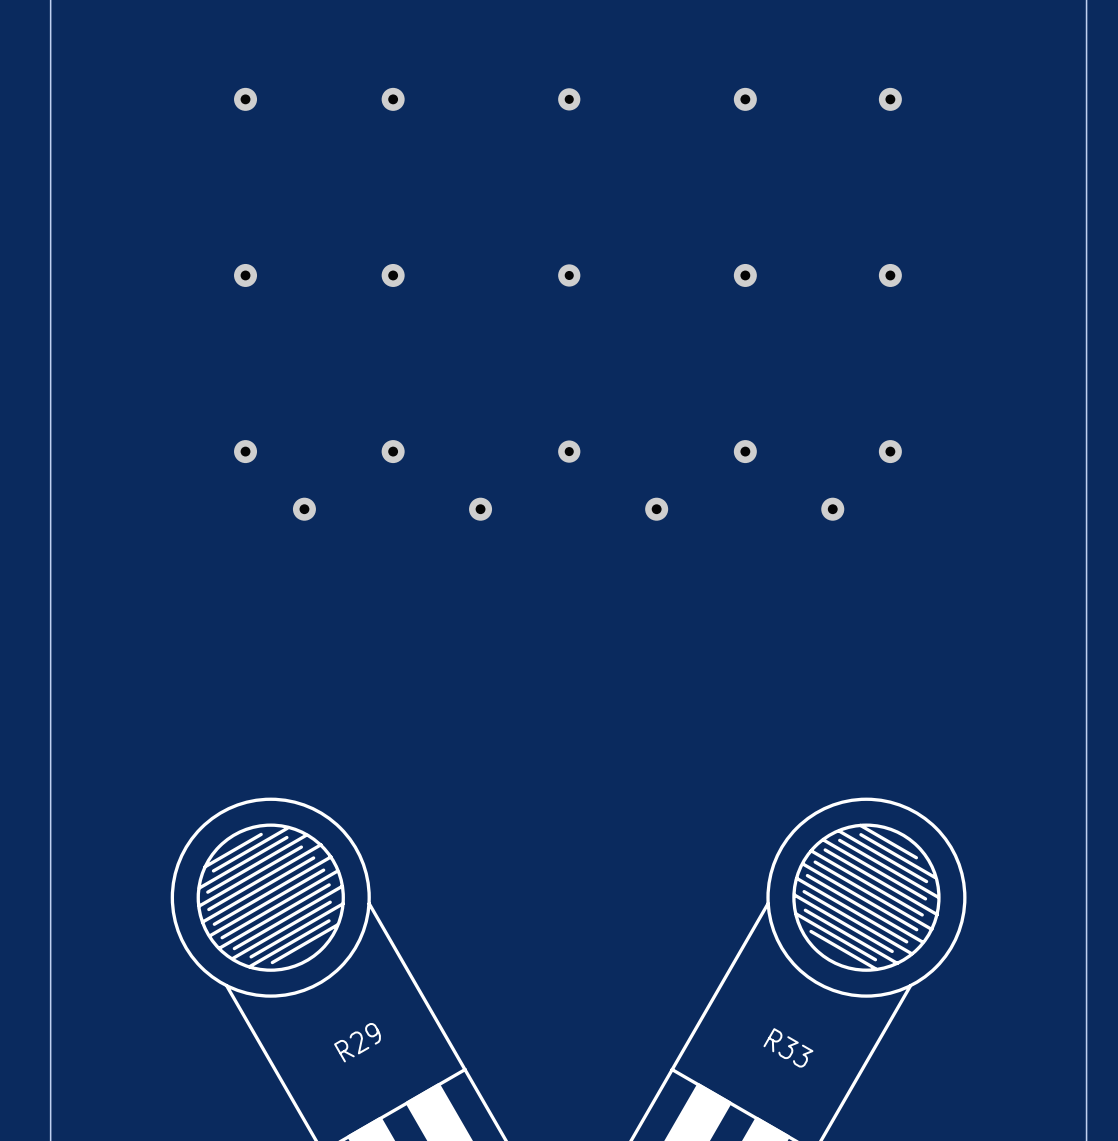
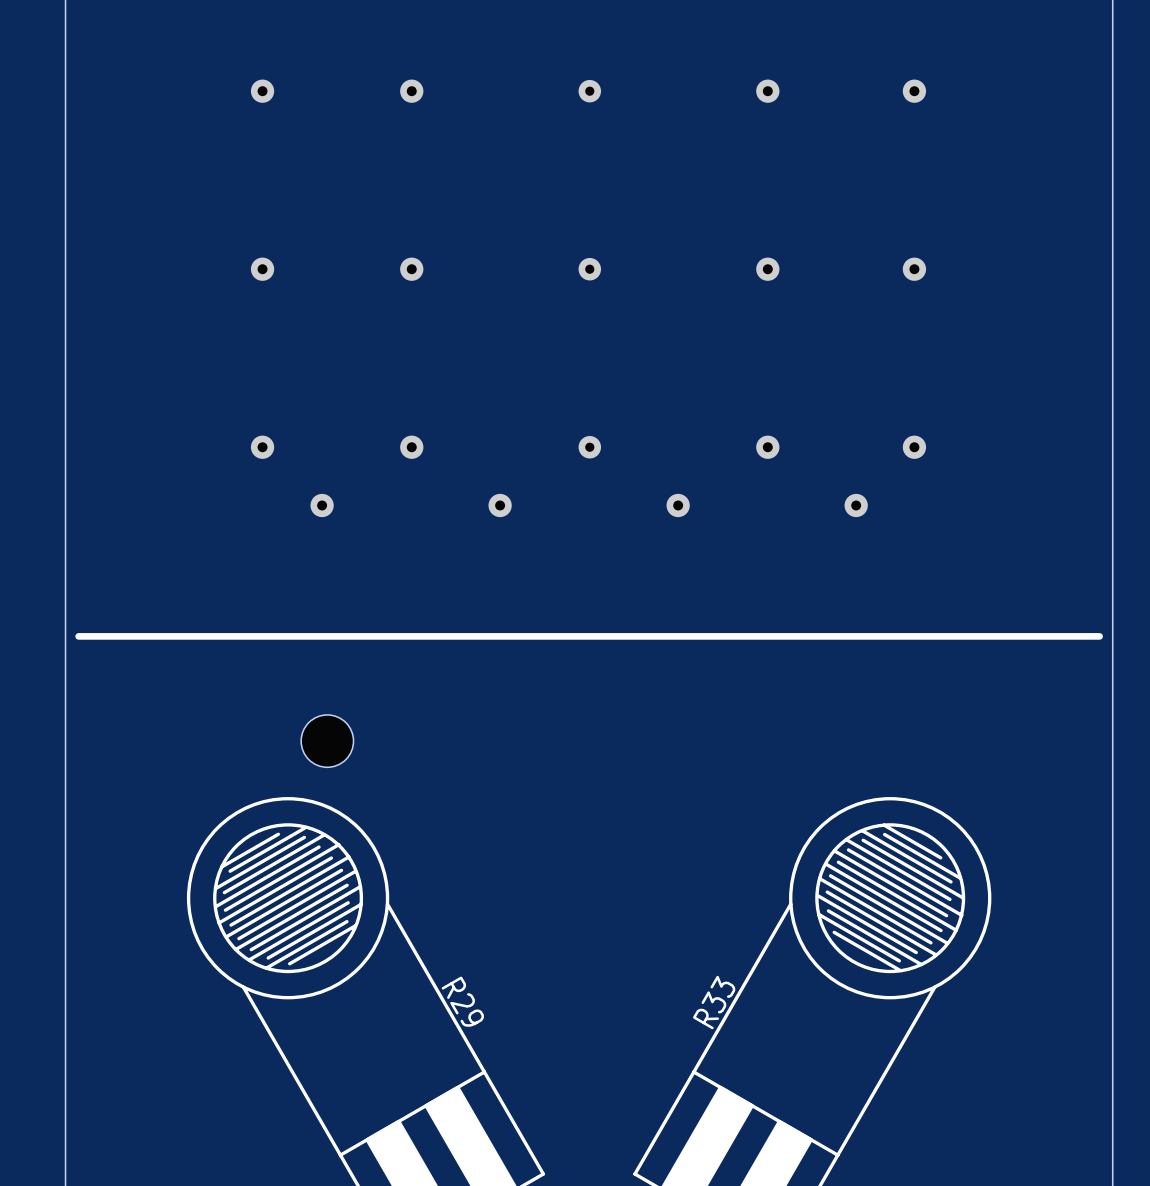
line: none -> (78, 636) (1099, 636)
hole: none -> (327, 741)
R29 name rotation: 0° (357, 1042) -> 90° clockwise (462, 1001)
R29 name position: R29 (357, 1042) -> R29 (462, 1001)
R33 name rotation: 0° (788, 1047) -> 90° counterclockwise (714, 1002)
R33 name position: R33 (788, 1047) -> R33 (714, 1002)

